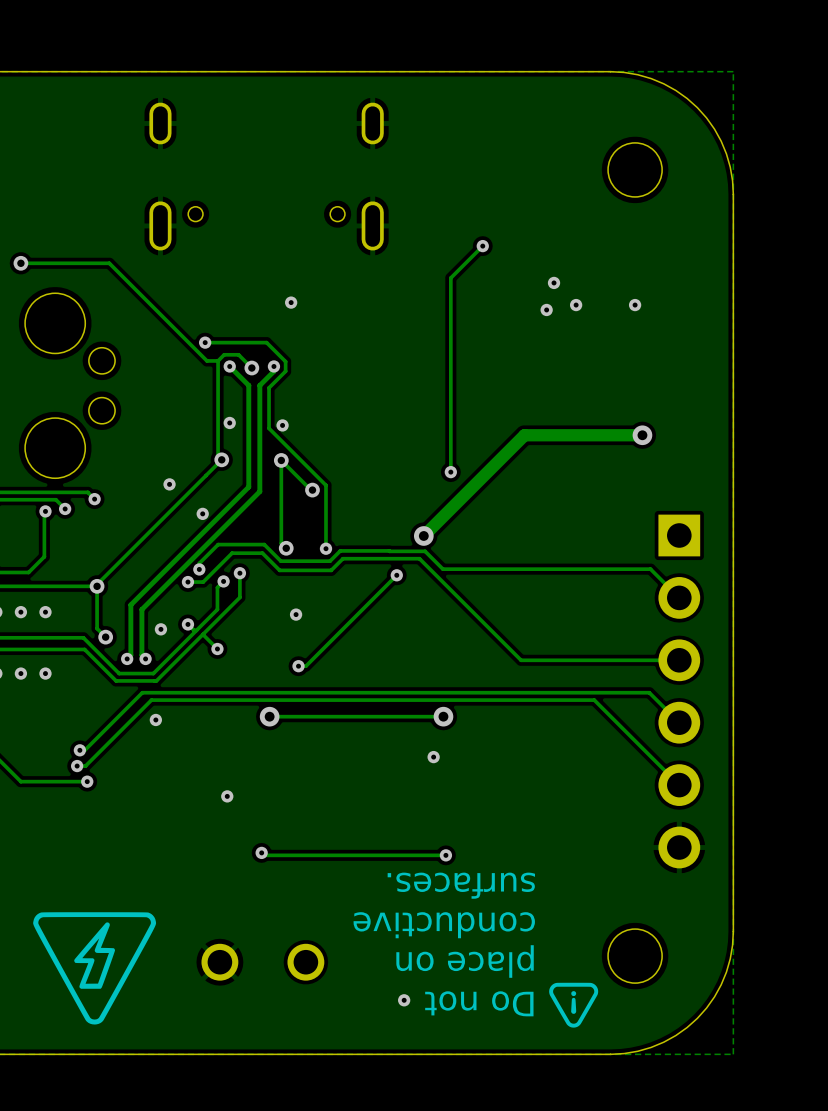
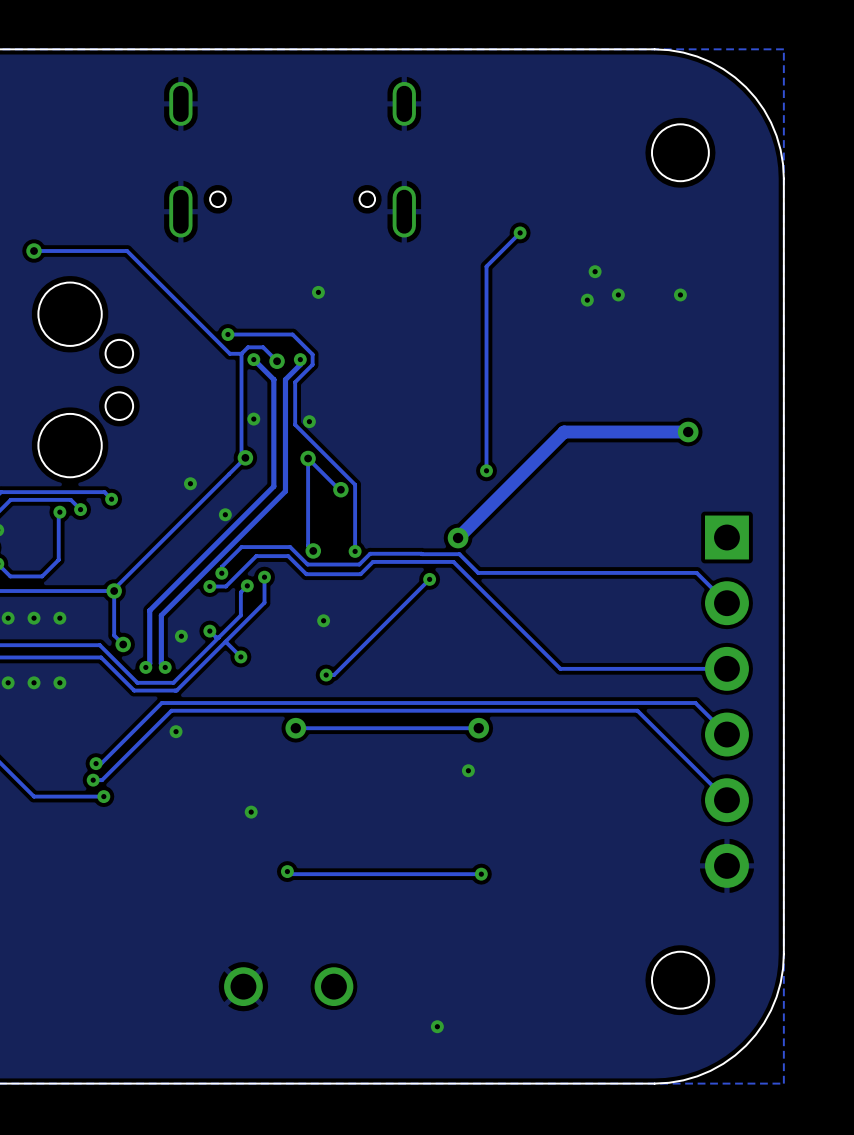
text: surfaces. (461, 885) -> none
drawing: [33, 912, 157, 1025] -> none
text: conductive (444, 925) -> none
text: place on (465, 961) -> none
drawing: [549, 982, 599, 1028] -> none
text: Do not (479, 1003) -> none

